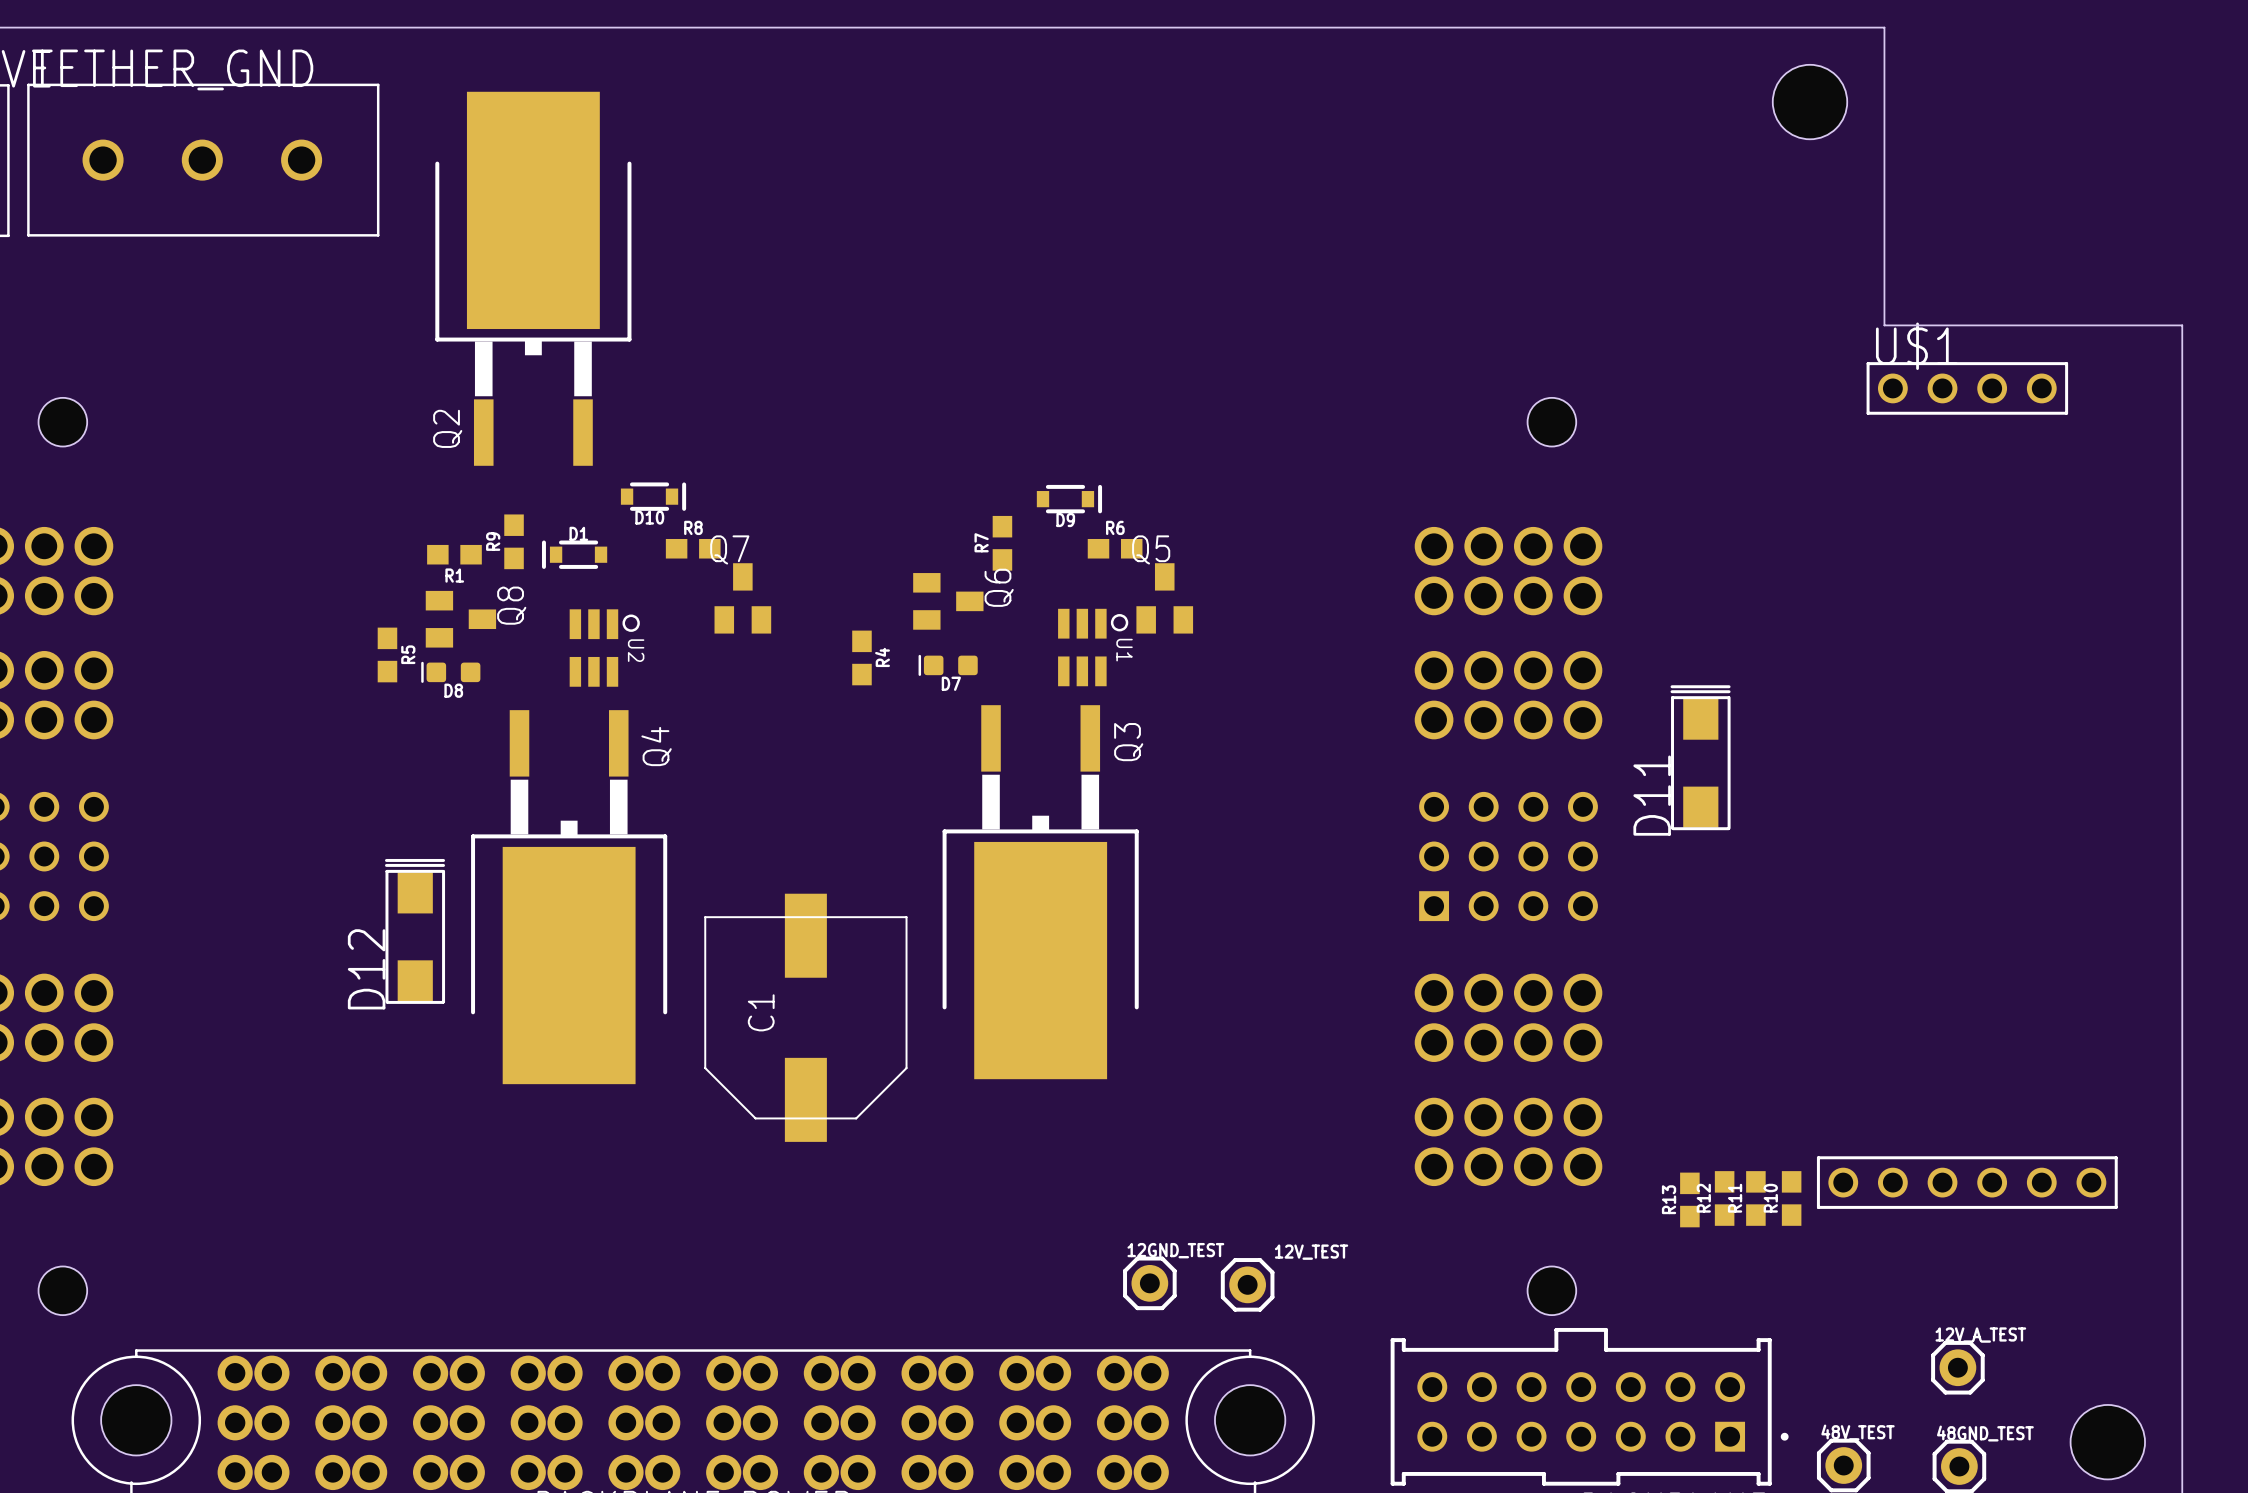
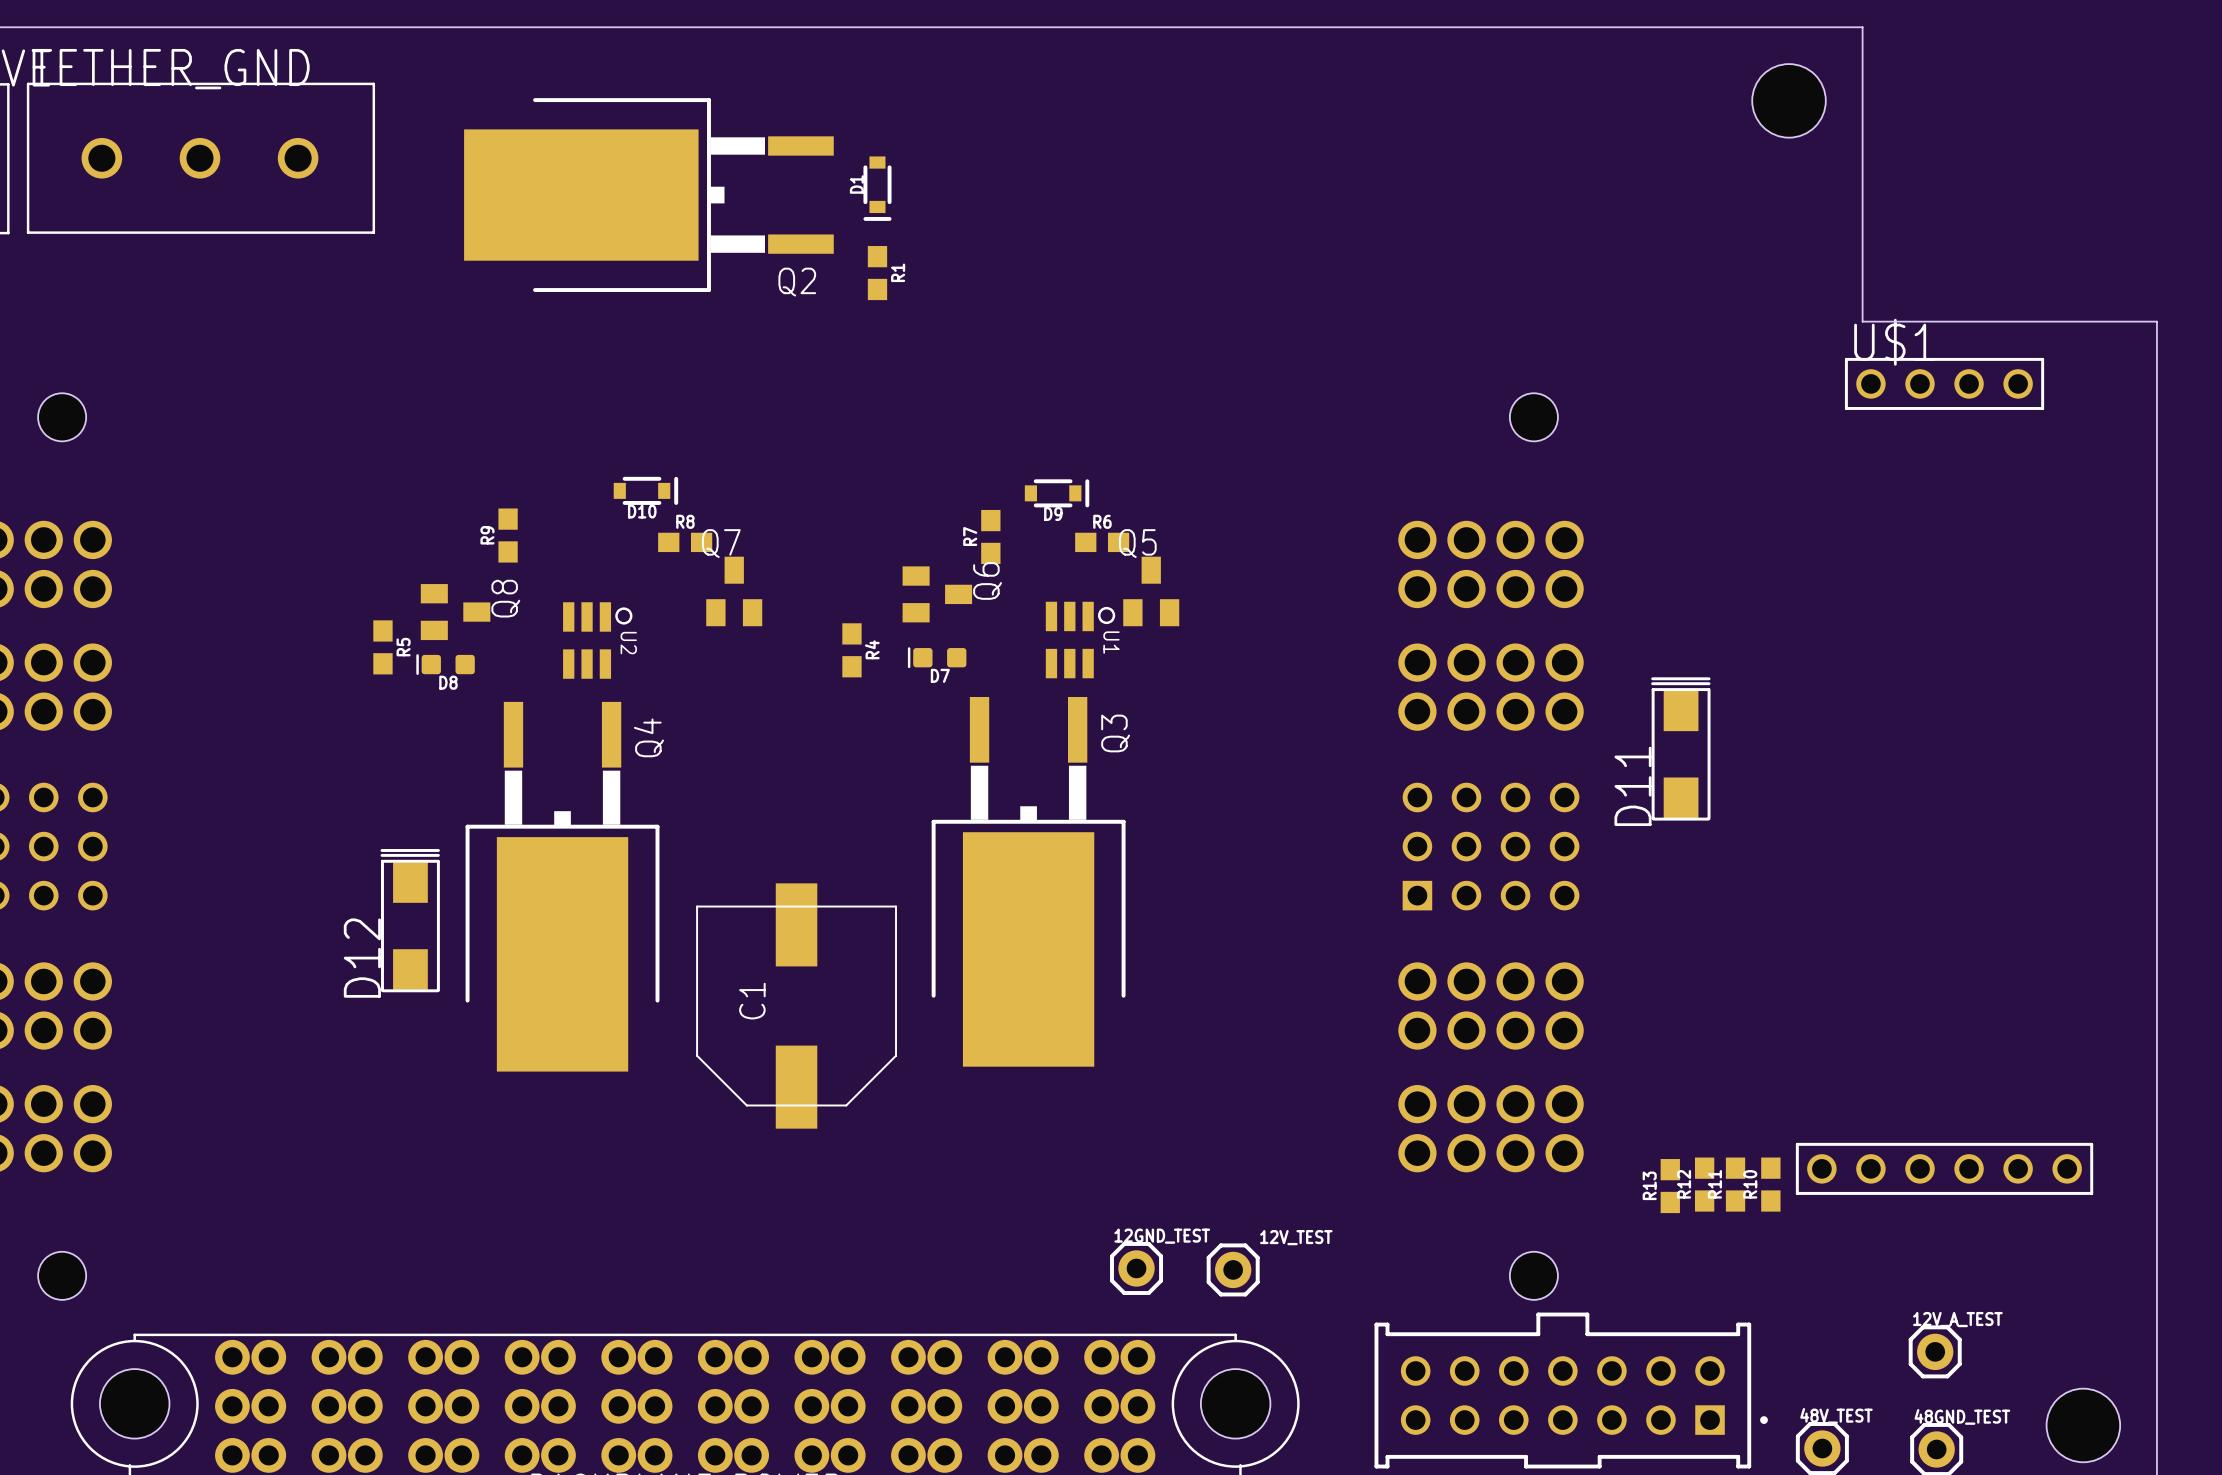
Q2 rotation: 0° (533, 278) -> 90° counterclockwise (648, 195)
R1 rotation: 0° (454, 554) -> 90° clockwise (877, 273)
R1 position: (454, 554) -> (877, 273)
D1 rotation: 0° (574, 554) -> 90° counterclockwise (877, 188)
D1 position: (574, 554) -> (877, 188)

